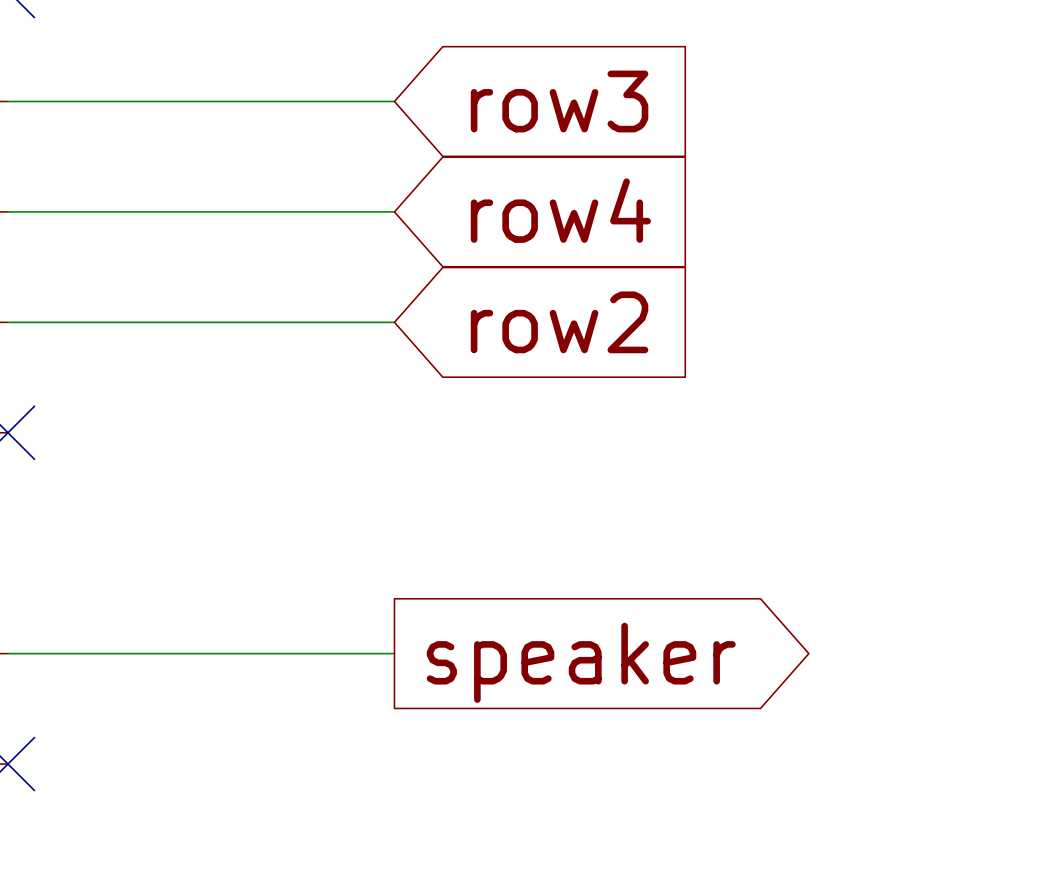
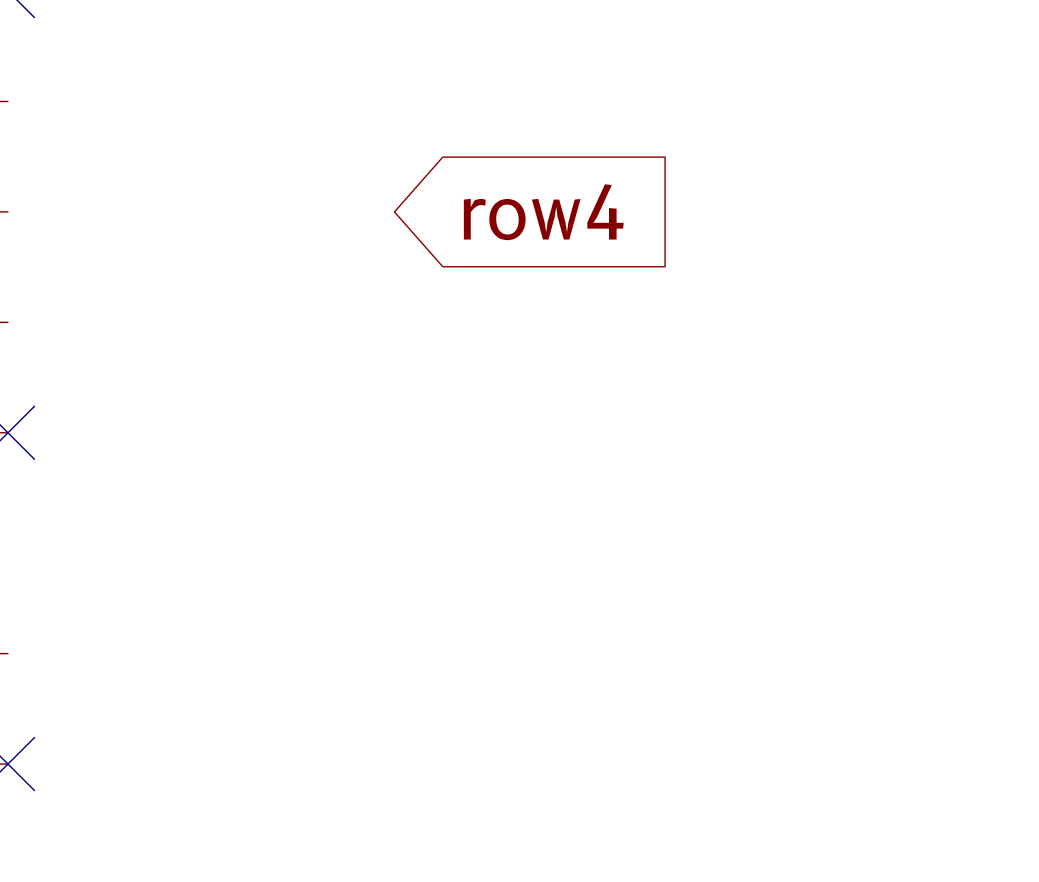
wire: (7, 101) (394, 101) -> none
global label: row3 (559, 101) -> none
wire: (7, 211) (394, 211) -> none
wire: (7, 322) (394, 322) -> none
global label: row2 (559, 322) -> none
wire: (7, 653) (394, 653) -> none
global label: speaker (581, 662) -> none

